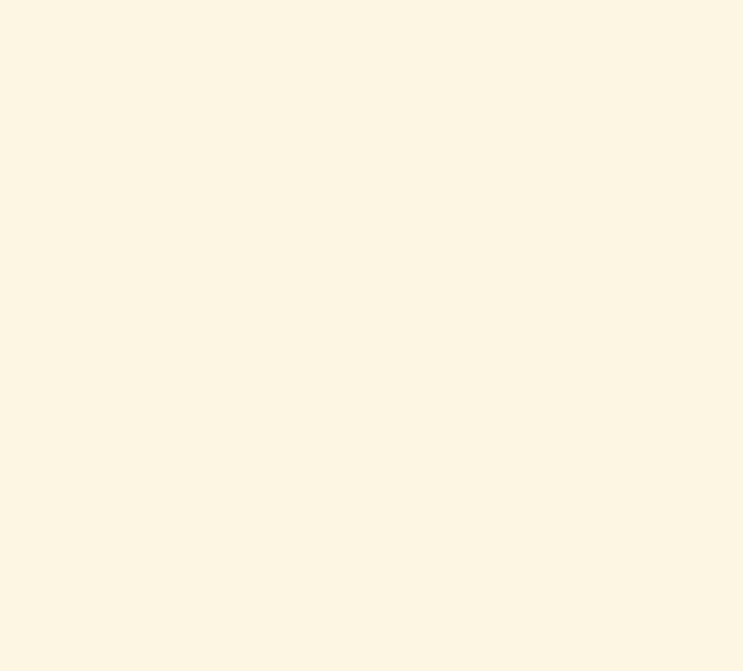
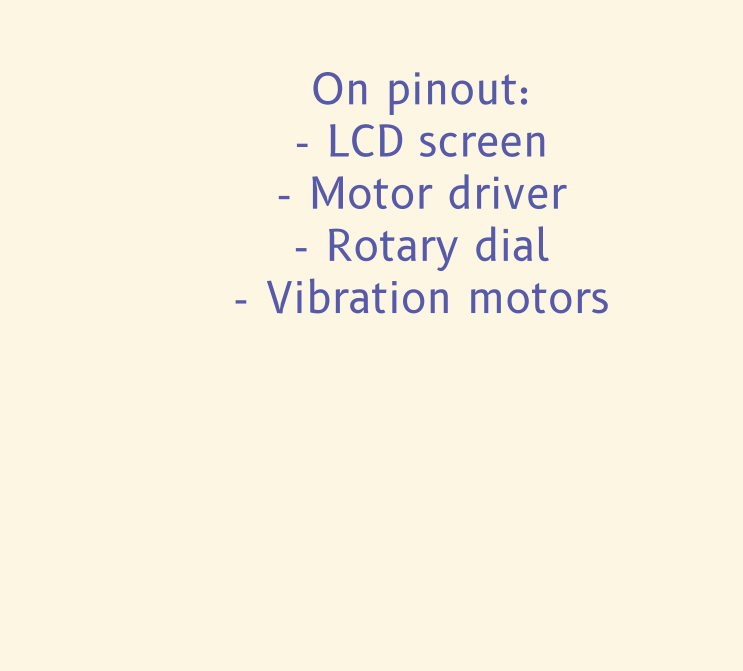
text: none -> On pinout: (420, 93)
text: none -> - LCD screen (420, 140)
text: none -> - Motor driver (422, 191)
text: none -> - Rotary dial (422, 248)
text: none -> - Vibration motors (421, 295)

